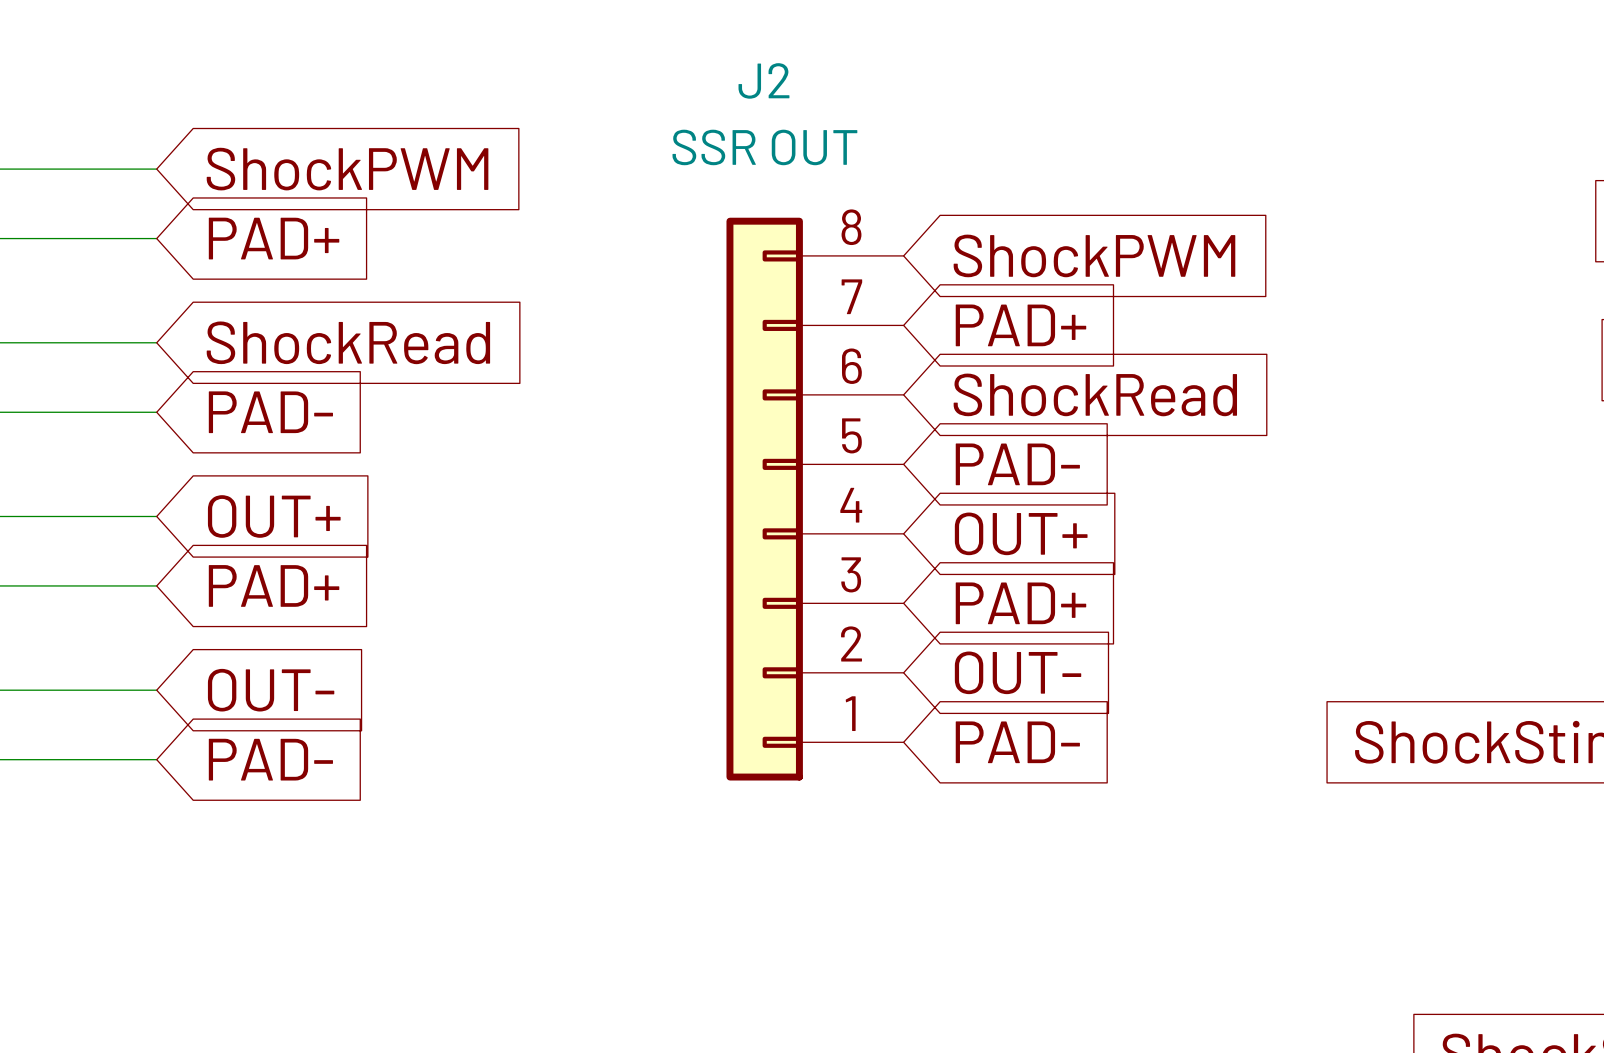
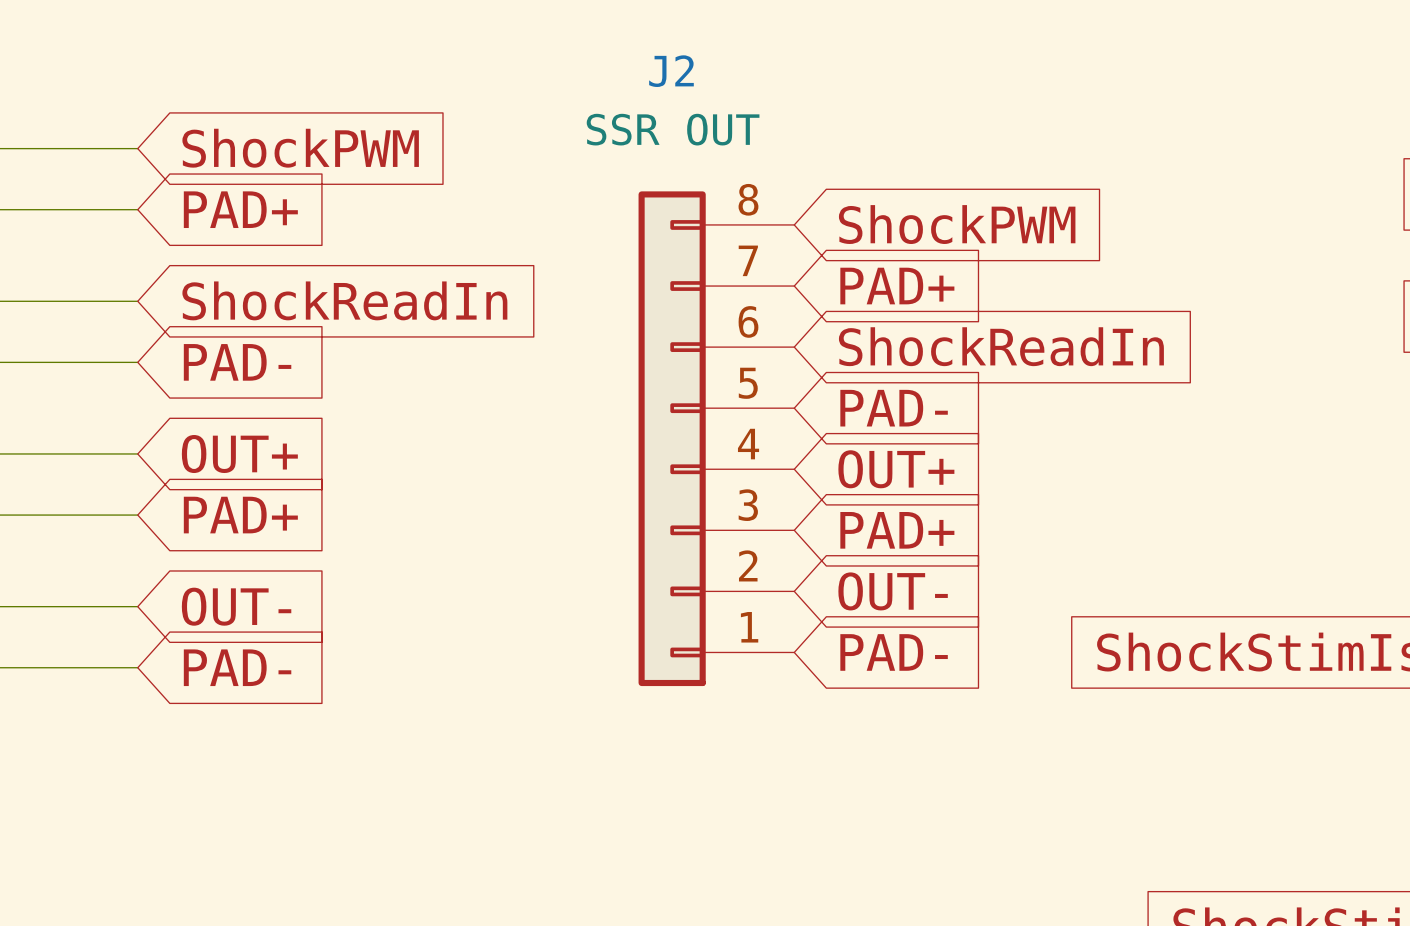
global label: ShockRead (348, 342) -> ShockReadIn (344, 300)
global label: ShockRead (1095, 394) -> ShockReadIn (1001, 346)

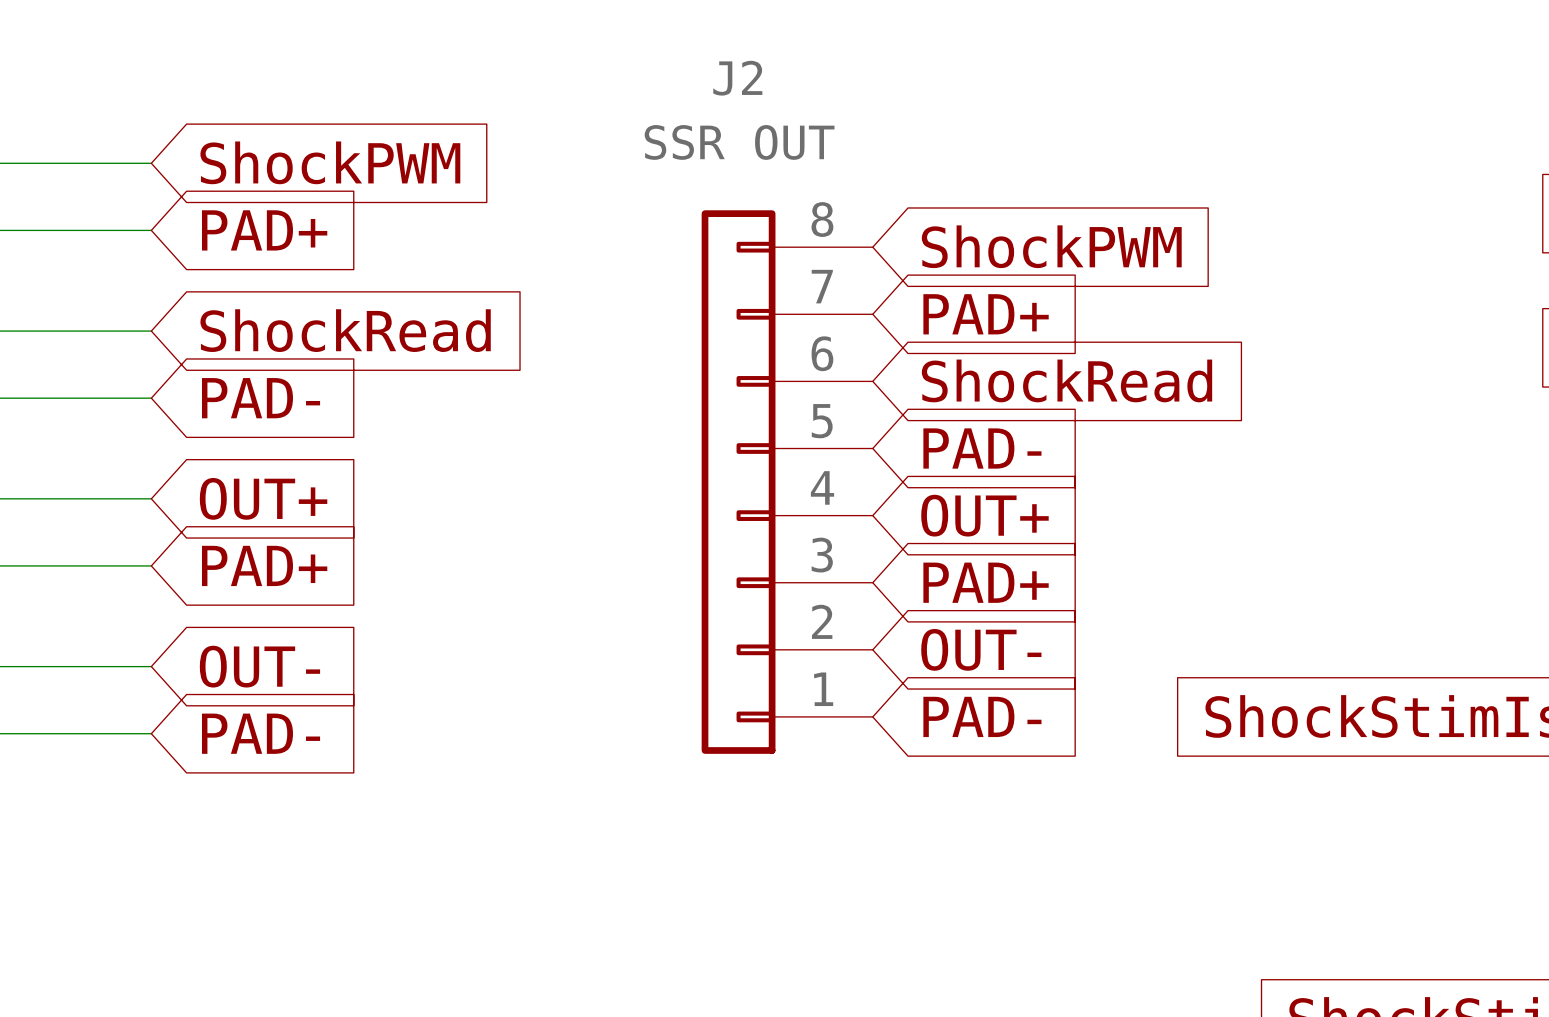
global label: ShockReadIn (344, 300) -> ShockRead (345, 330)
global label: ShockReadIn (1001, 346) -> ShockRead (1066, 380)

